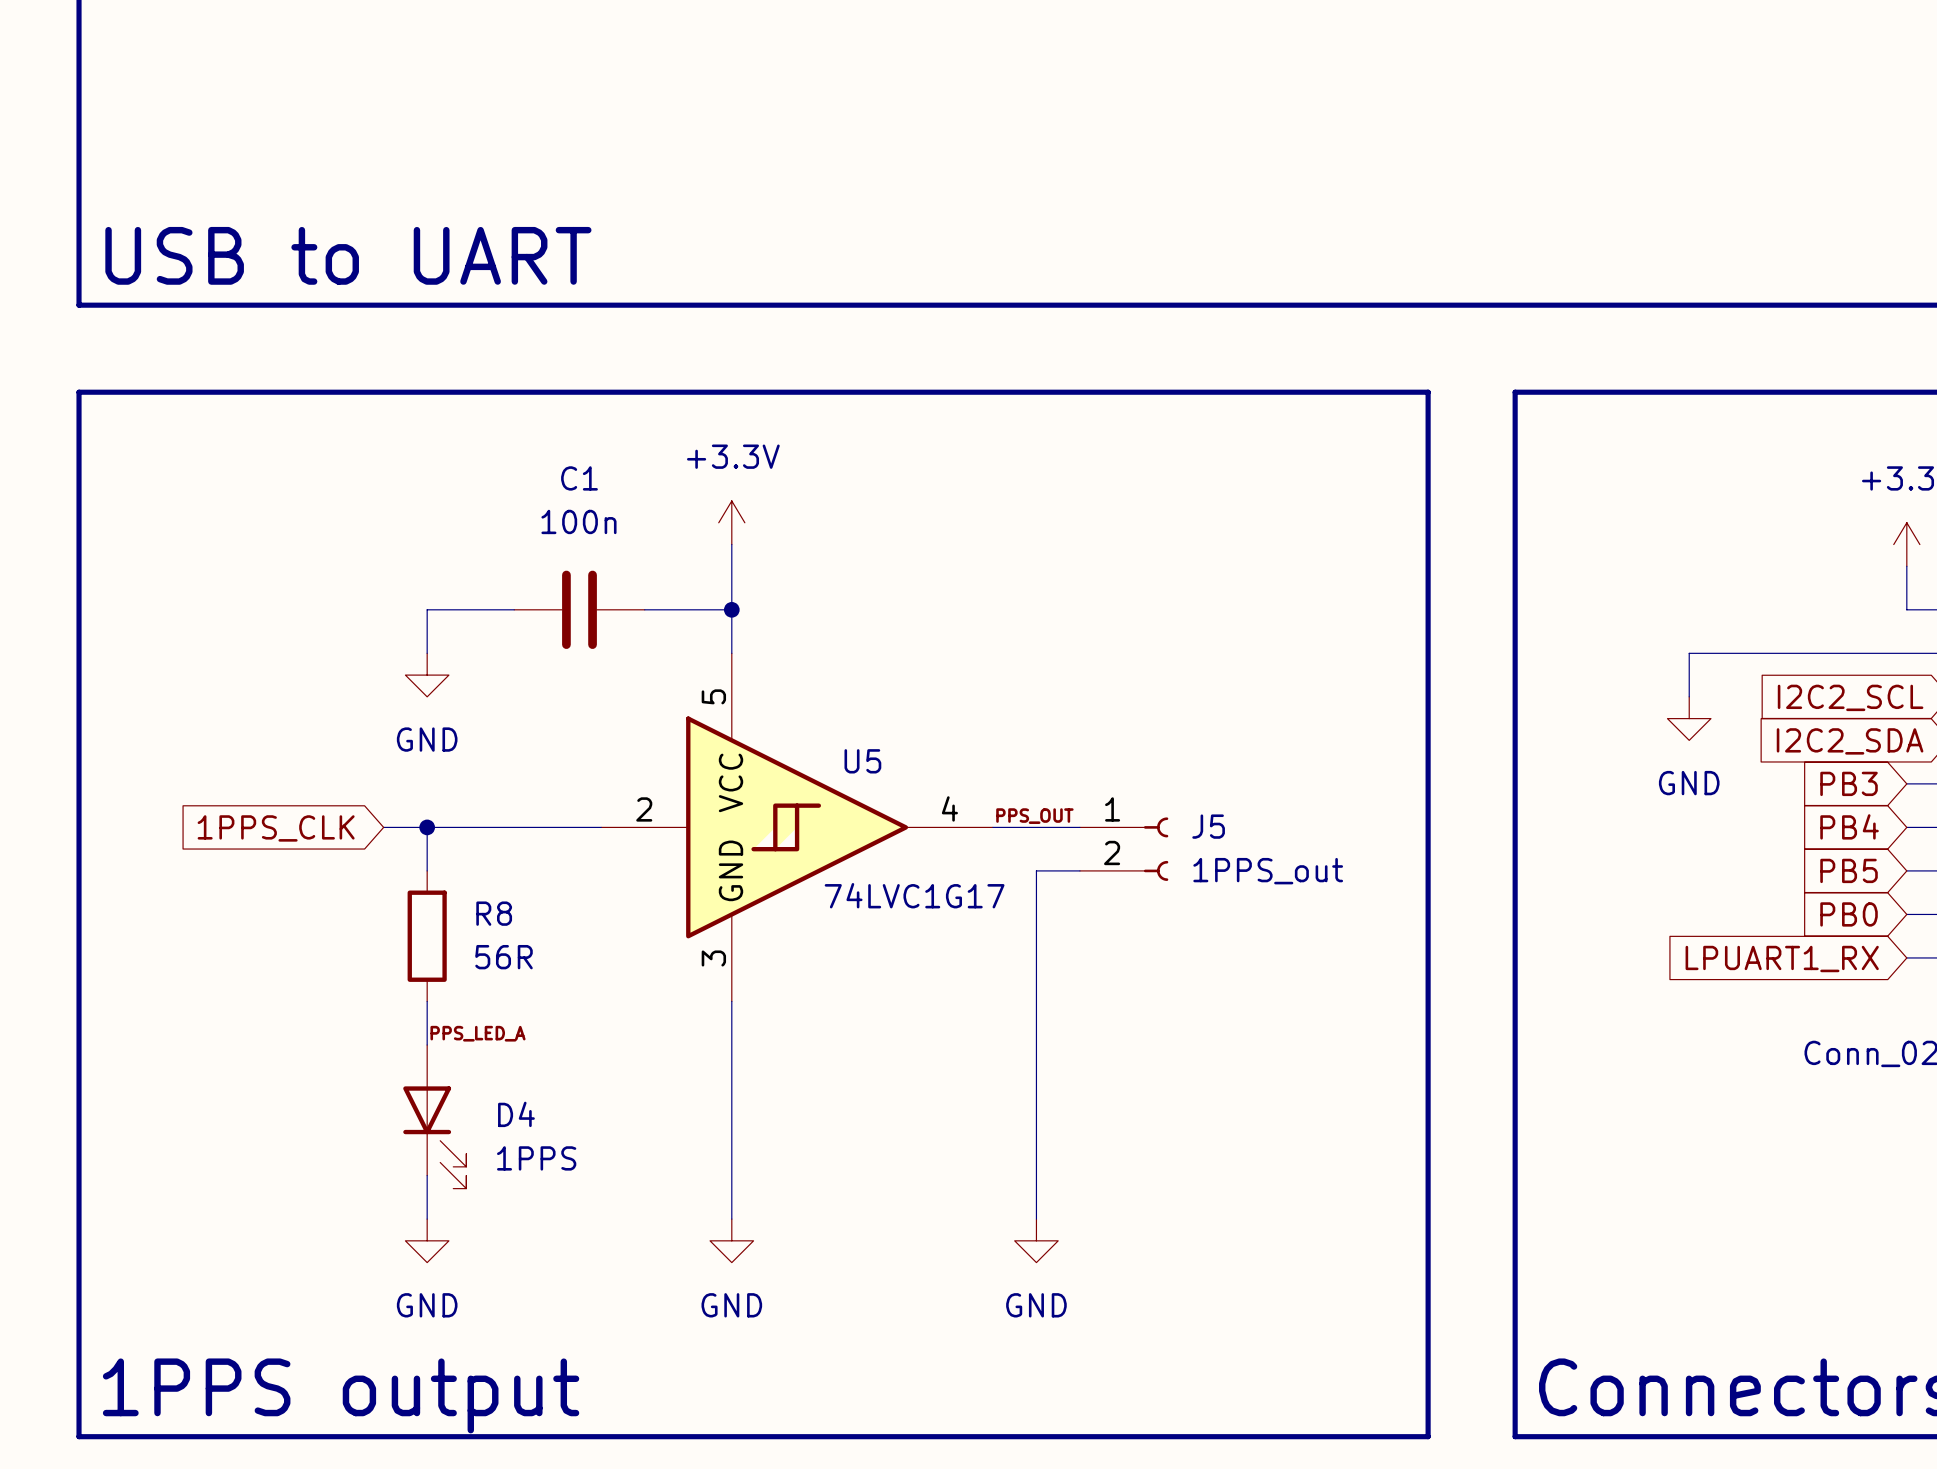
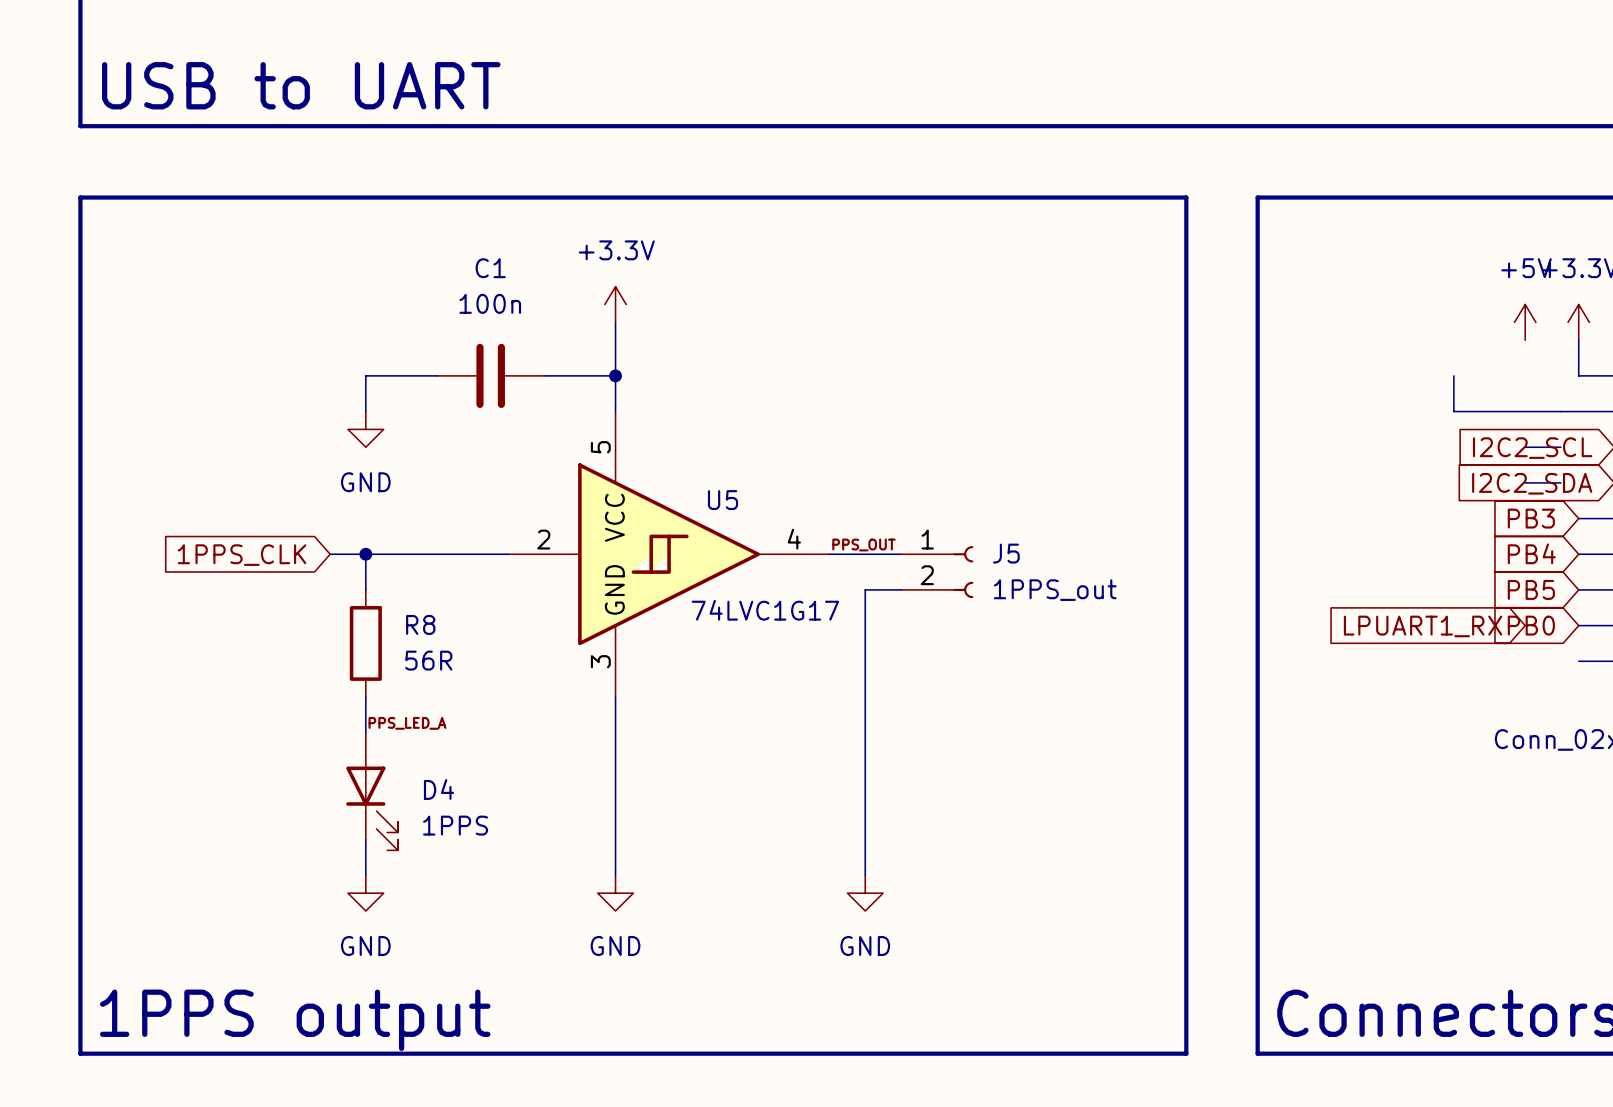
power symbol: none -> +5V (1525, 322)
wire: (1754, 653) (1689, 653) (1689, 696) -> (1453, 411) (1453, 375)
wire: none -> (1525, 447) (1560, 447)
power symbol: GND (1689, 718) -> none
wire: none -> (1525, 482) (1560, 482)
global label position: LPUART1_RX (1782, 959) -> LPUART1_RX (1423, 626)

